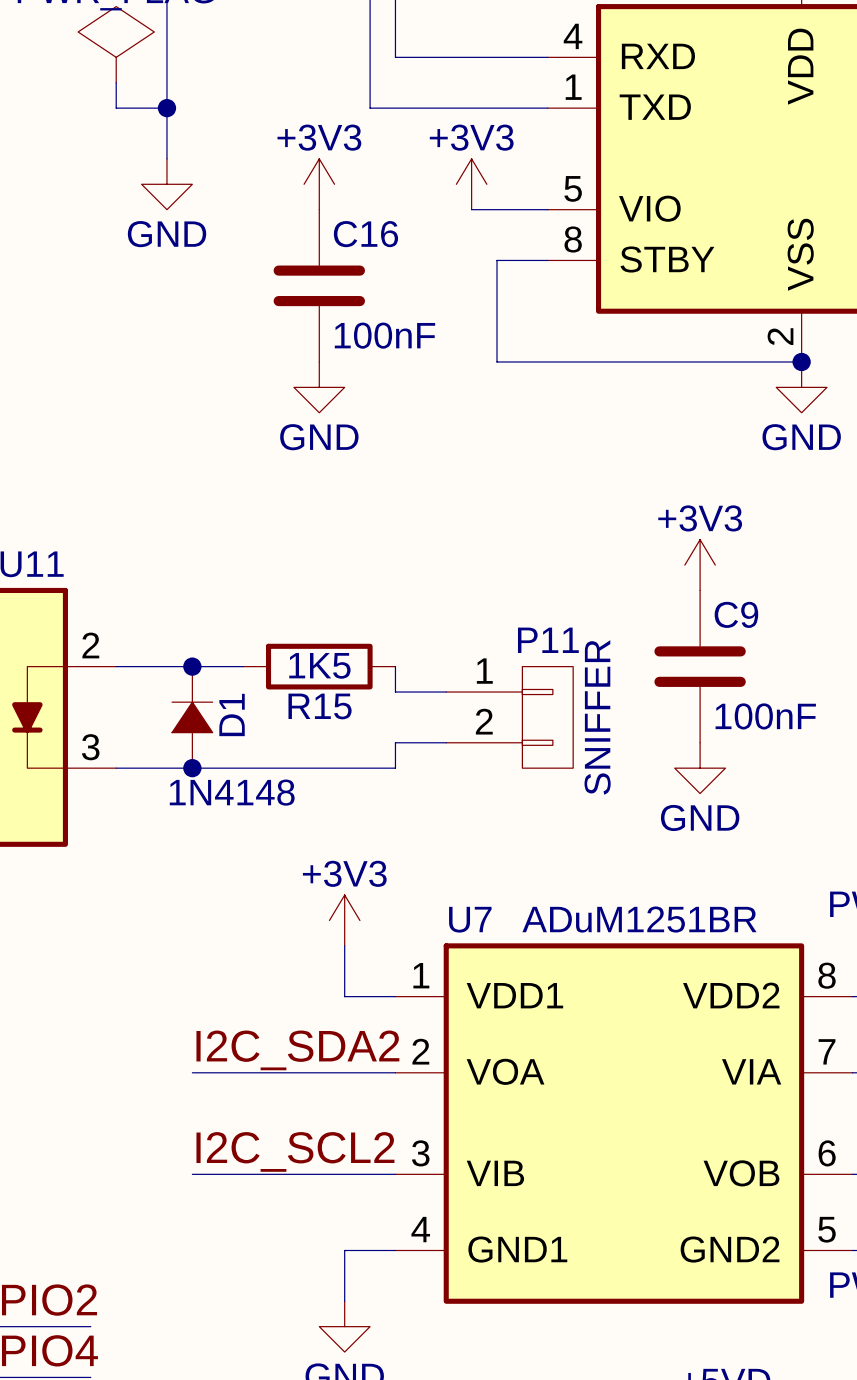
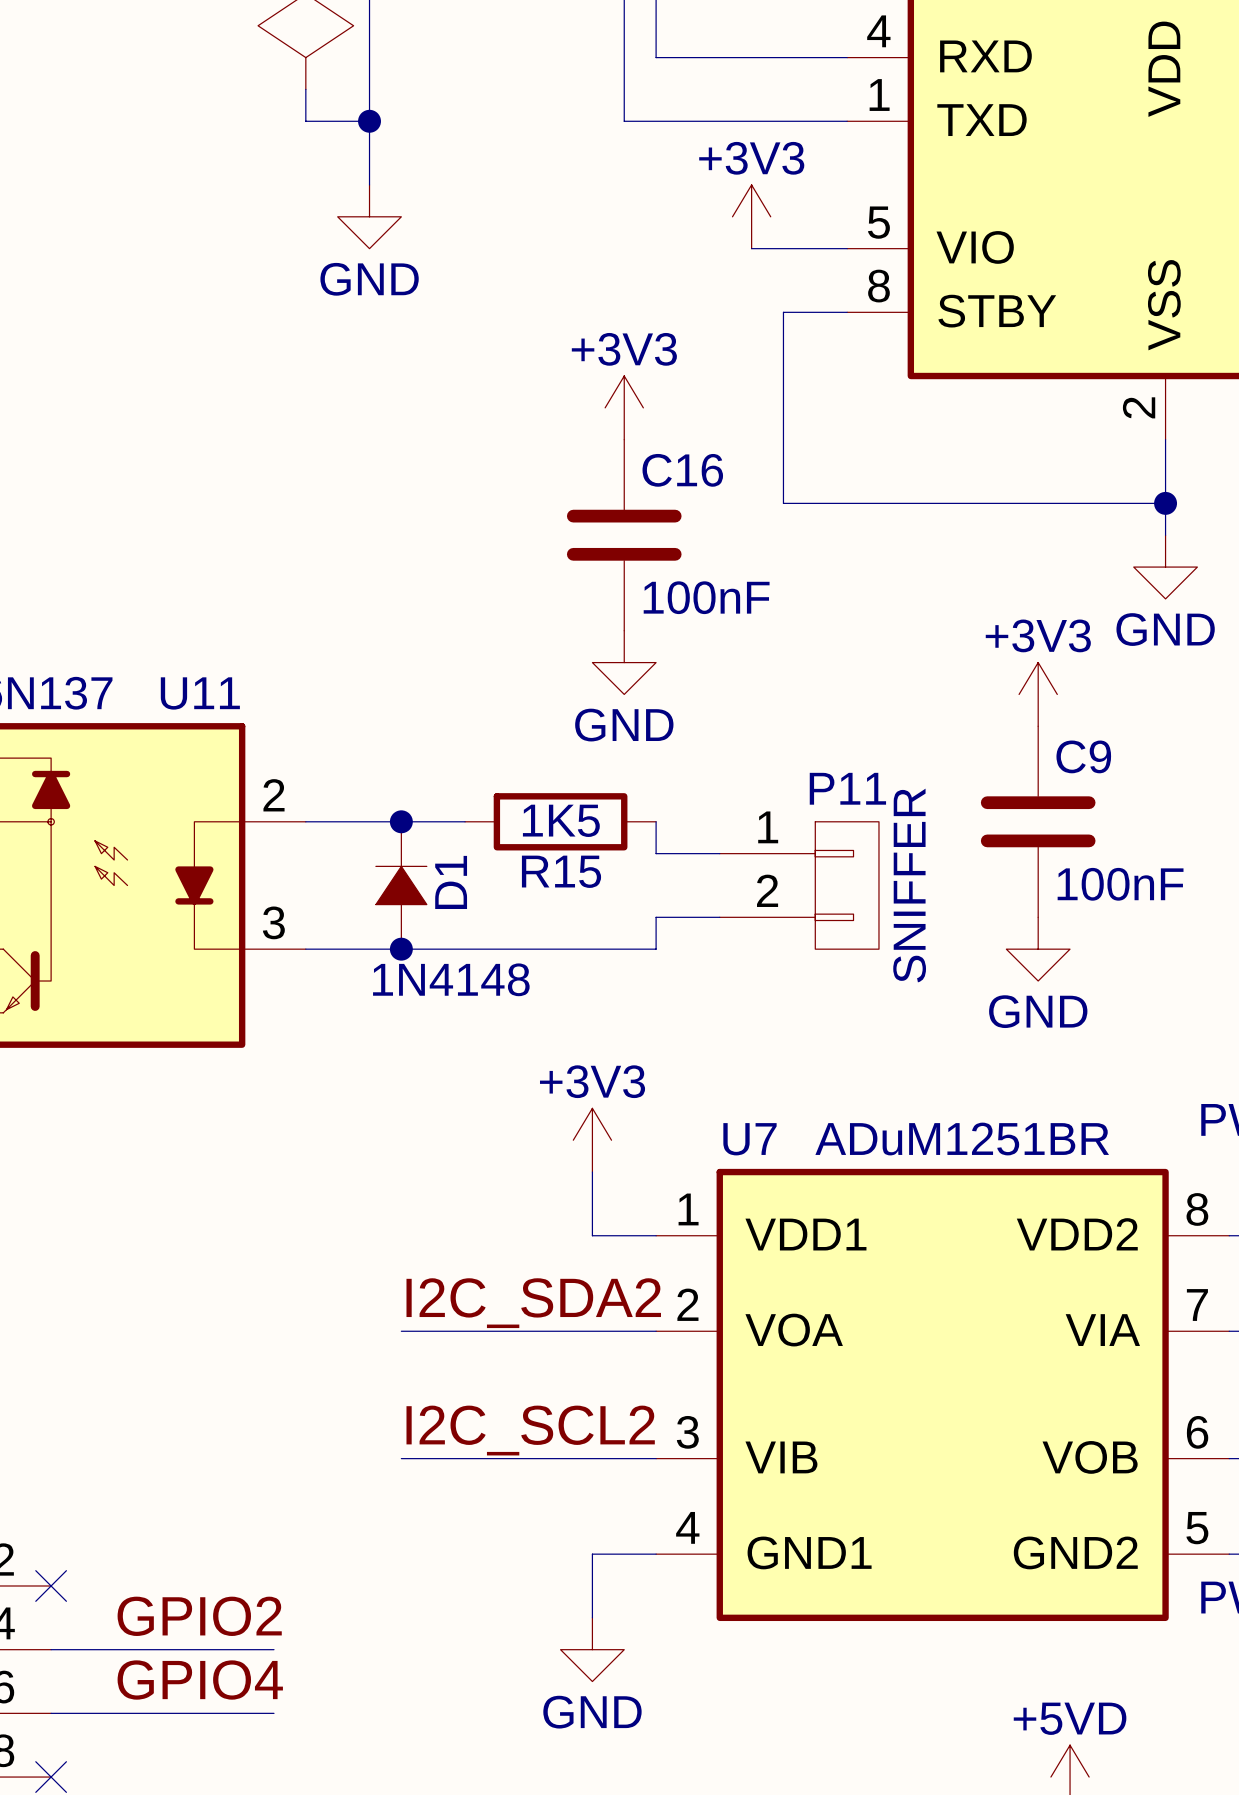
power symbol position: +3V3 (319, 184) -> +3V3 (624, 407)
C16 position: (319, 285) -> (624, 535)
wire: (497, 361) (801, 361) -> (783, 439) (783, 503) (1165, 503)
wire: none -> (1165, 439) (1165, 535)
junction position: (801, 361) -> (1165, 503)
power symbol position: GND (319, 387) -> GND (624, 662)
power symbol position: GND (801, 387) -> GND (1165, 567)

